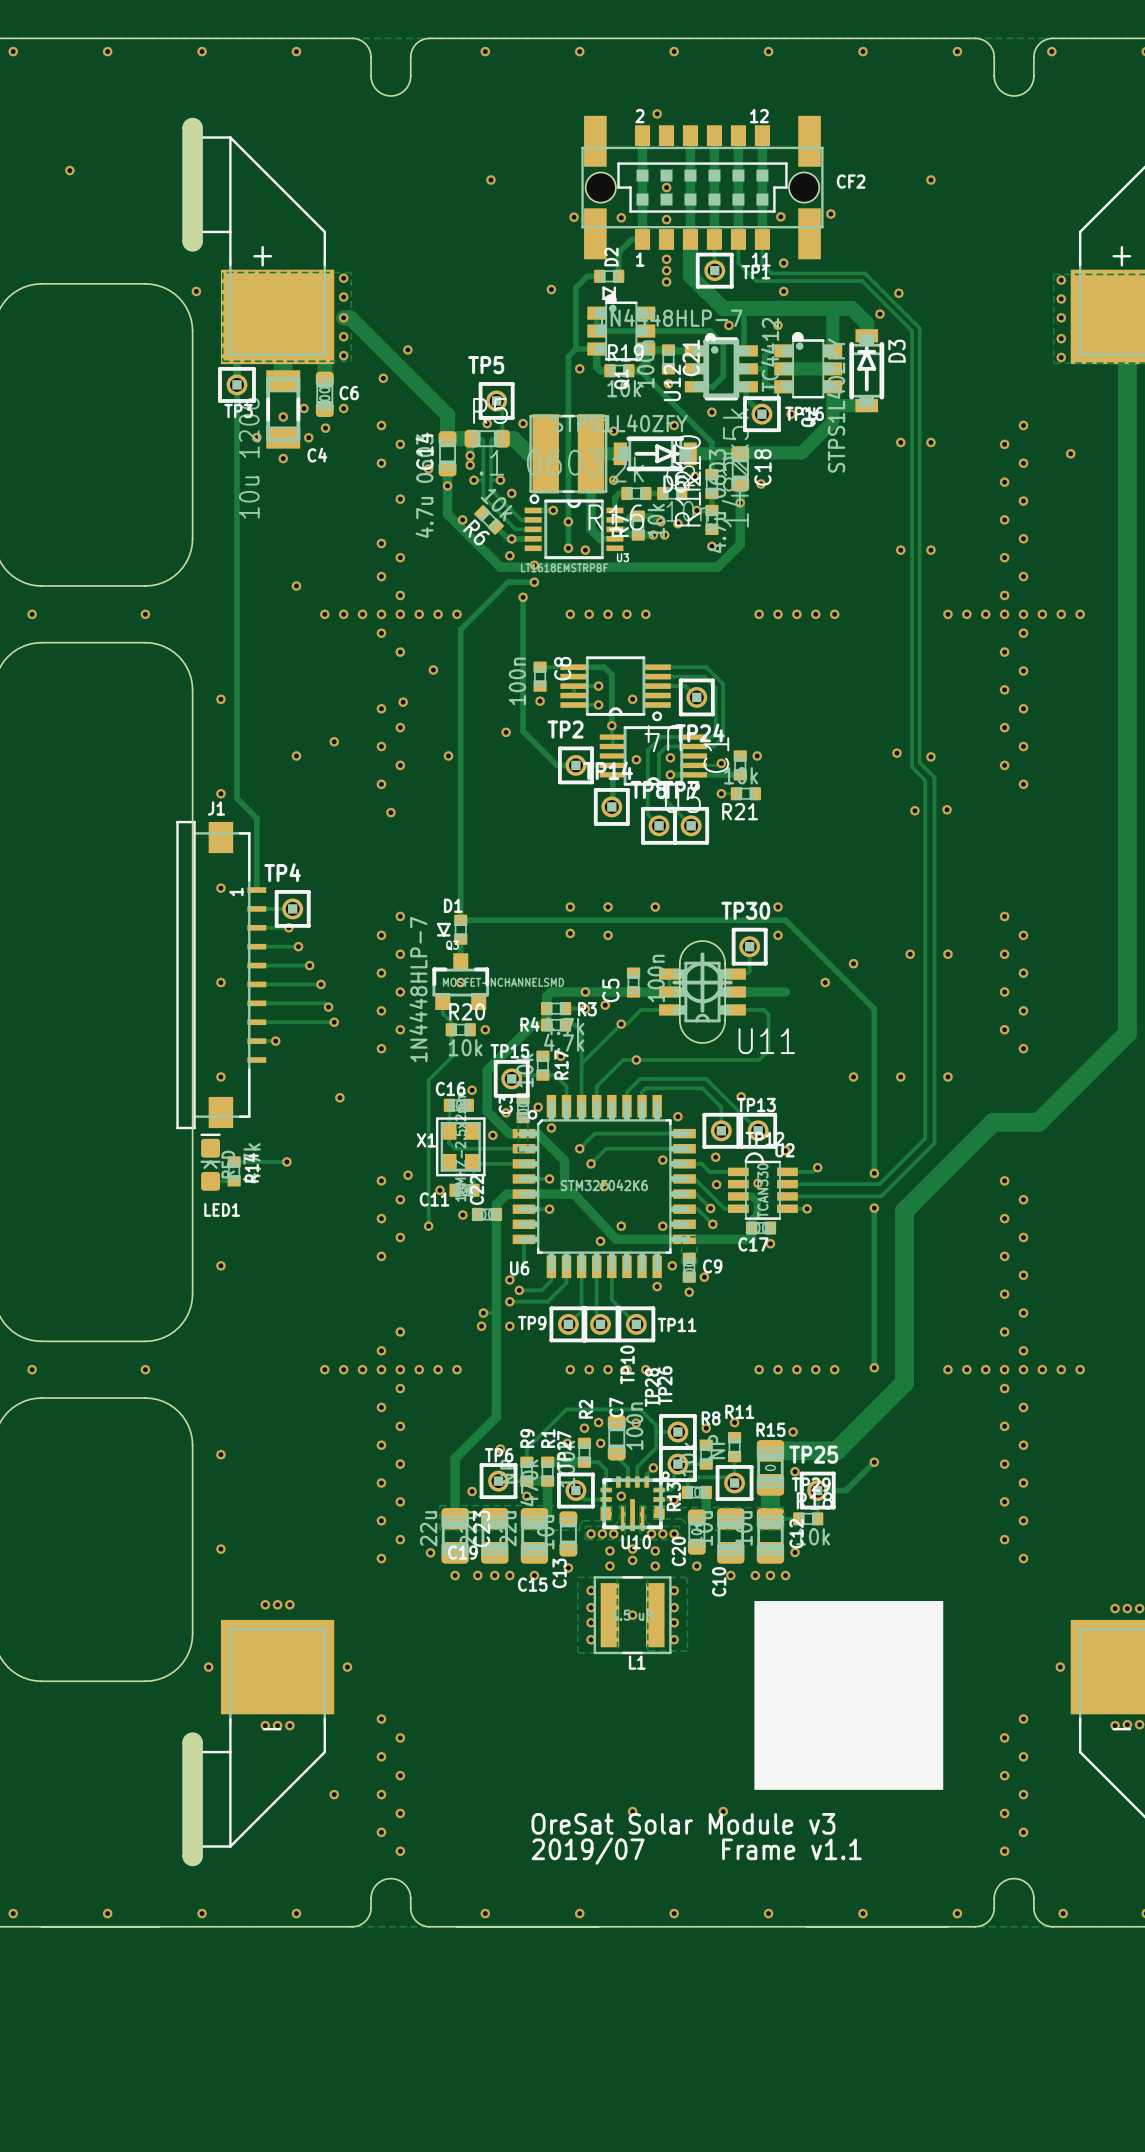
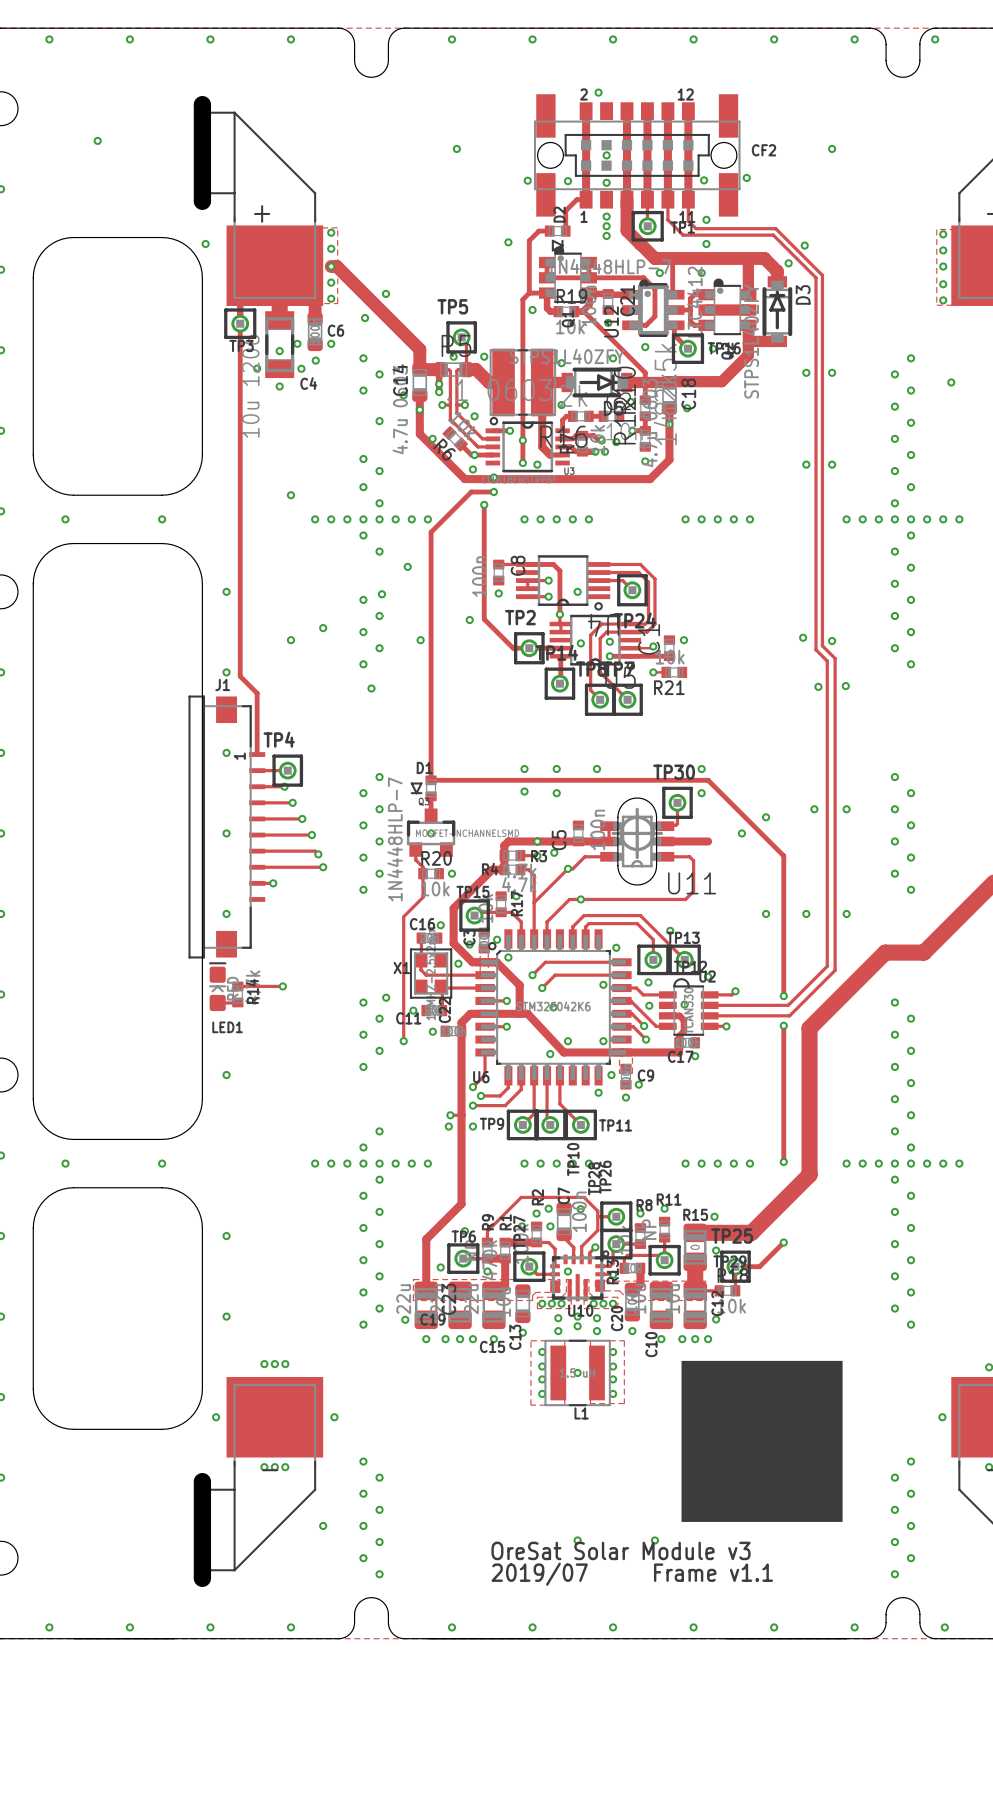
via: (339, 1097) -> none

